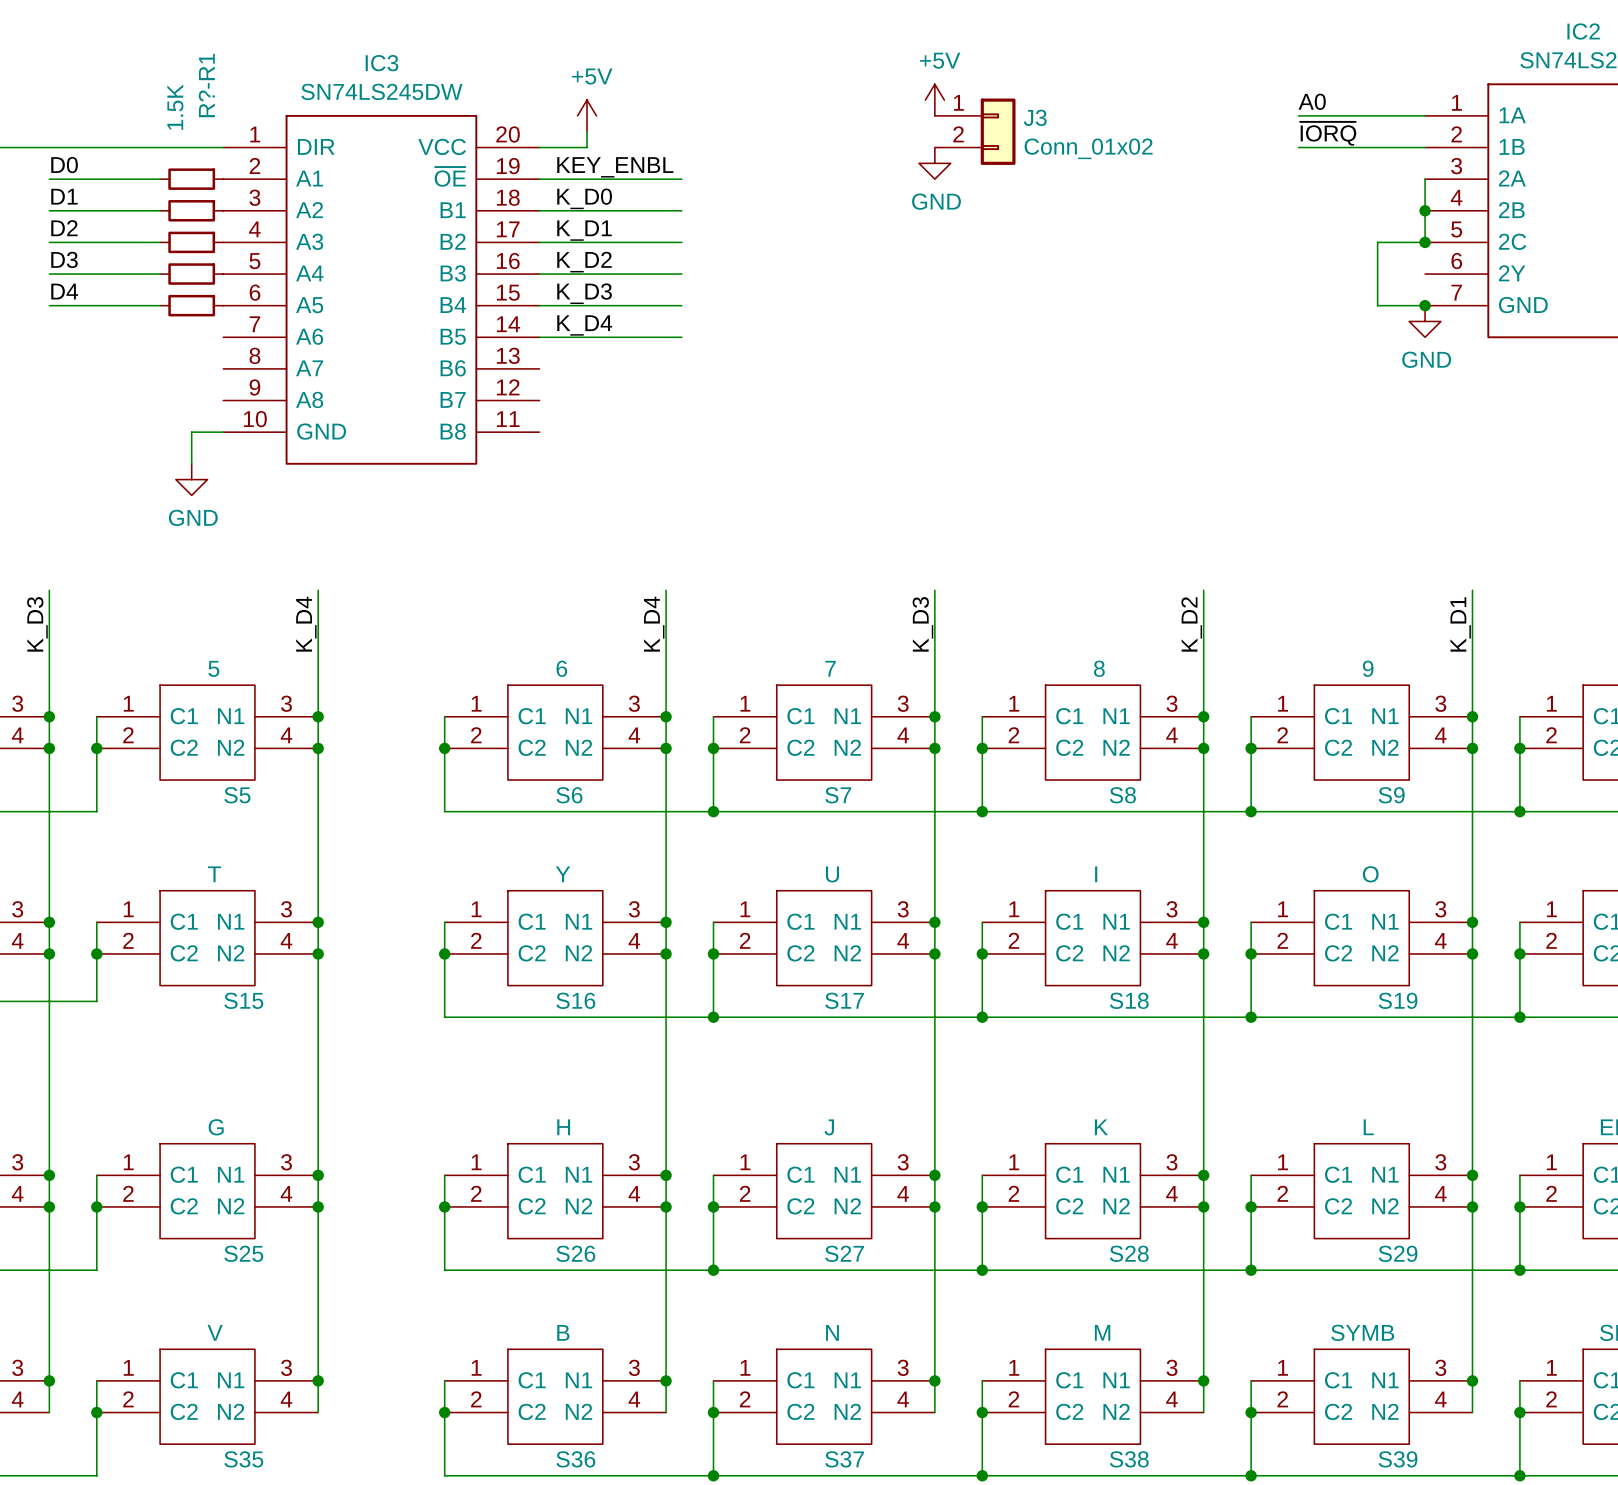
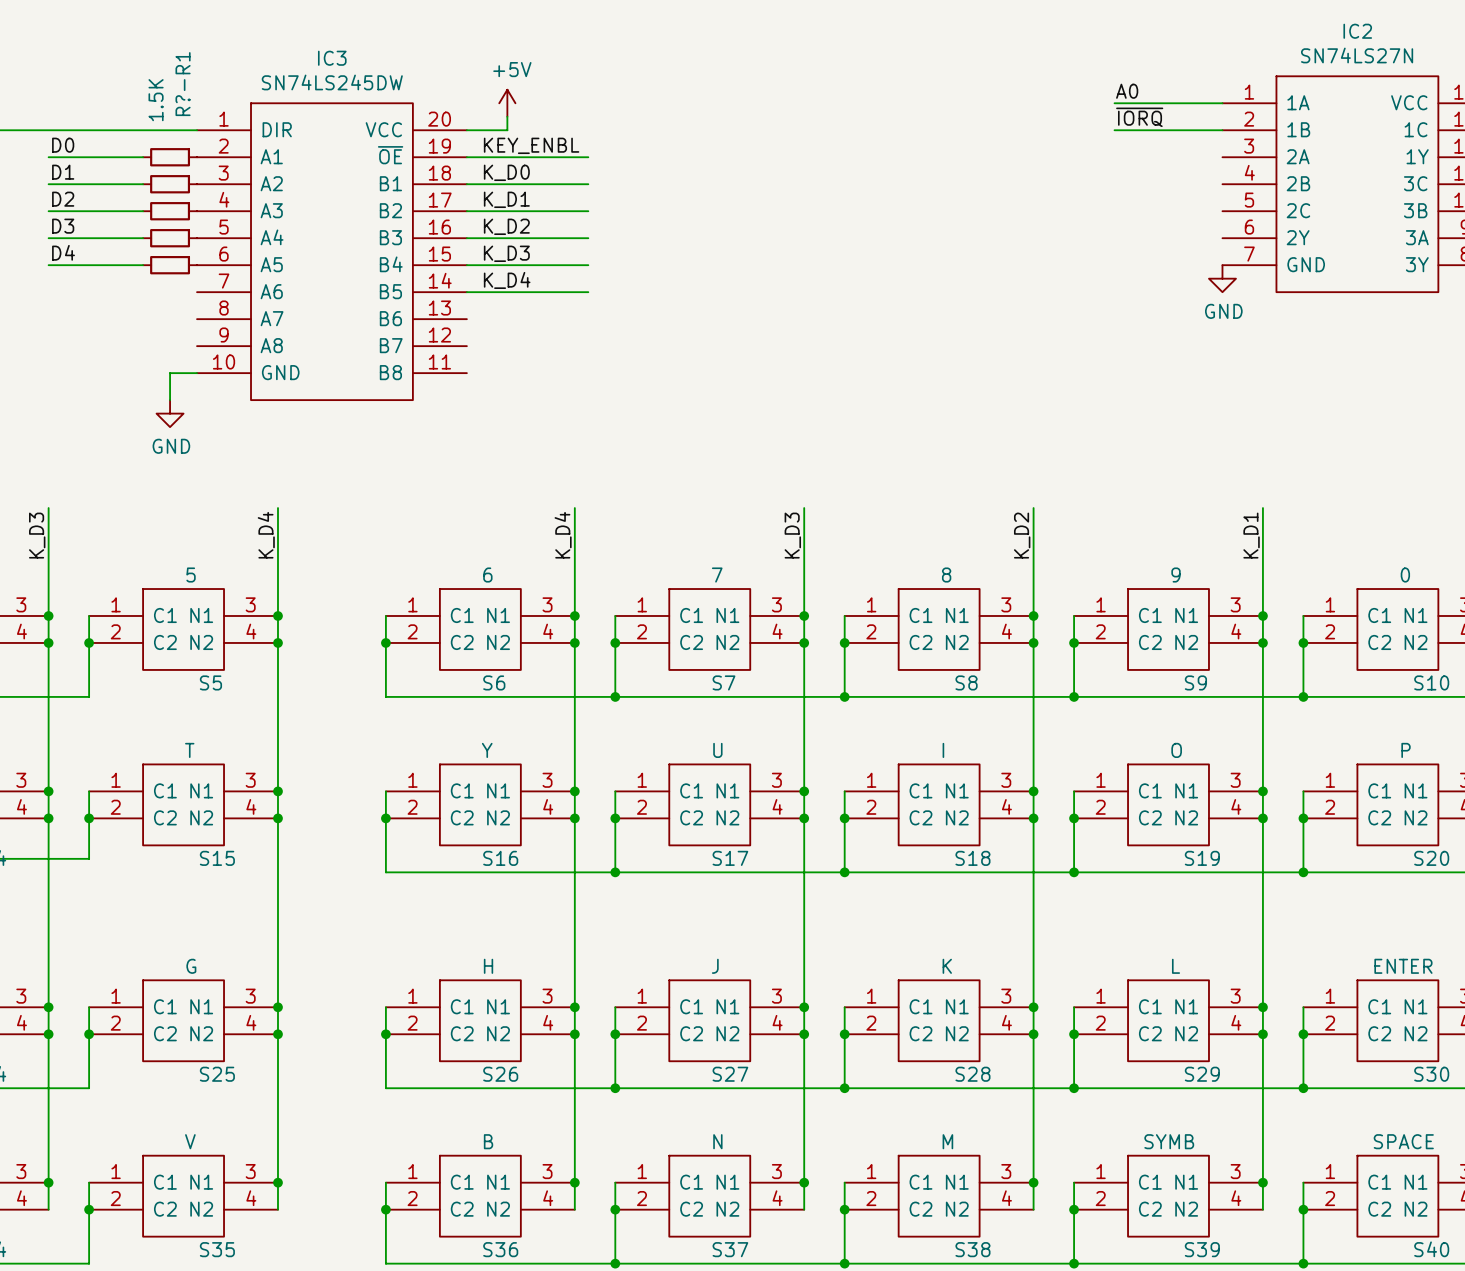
power symbol: +5V (934, 100) -> none
J3: Conn_01x02 (975, 131) -> none
power symbol: GND (934, 163) -> none
wire: (1425, 179) (1425, 242) (1377, 242) (1377, 305) (1425, 305) -> none
junction: (1425, 210) -> none
junction: (1425, 242) -> none
junction: (1425, 305) -> none

